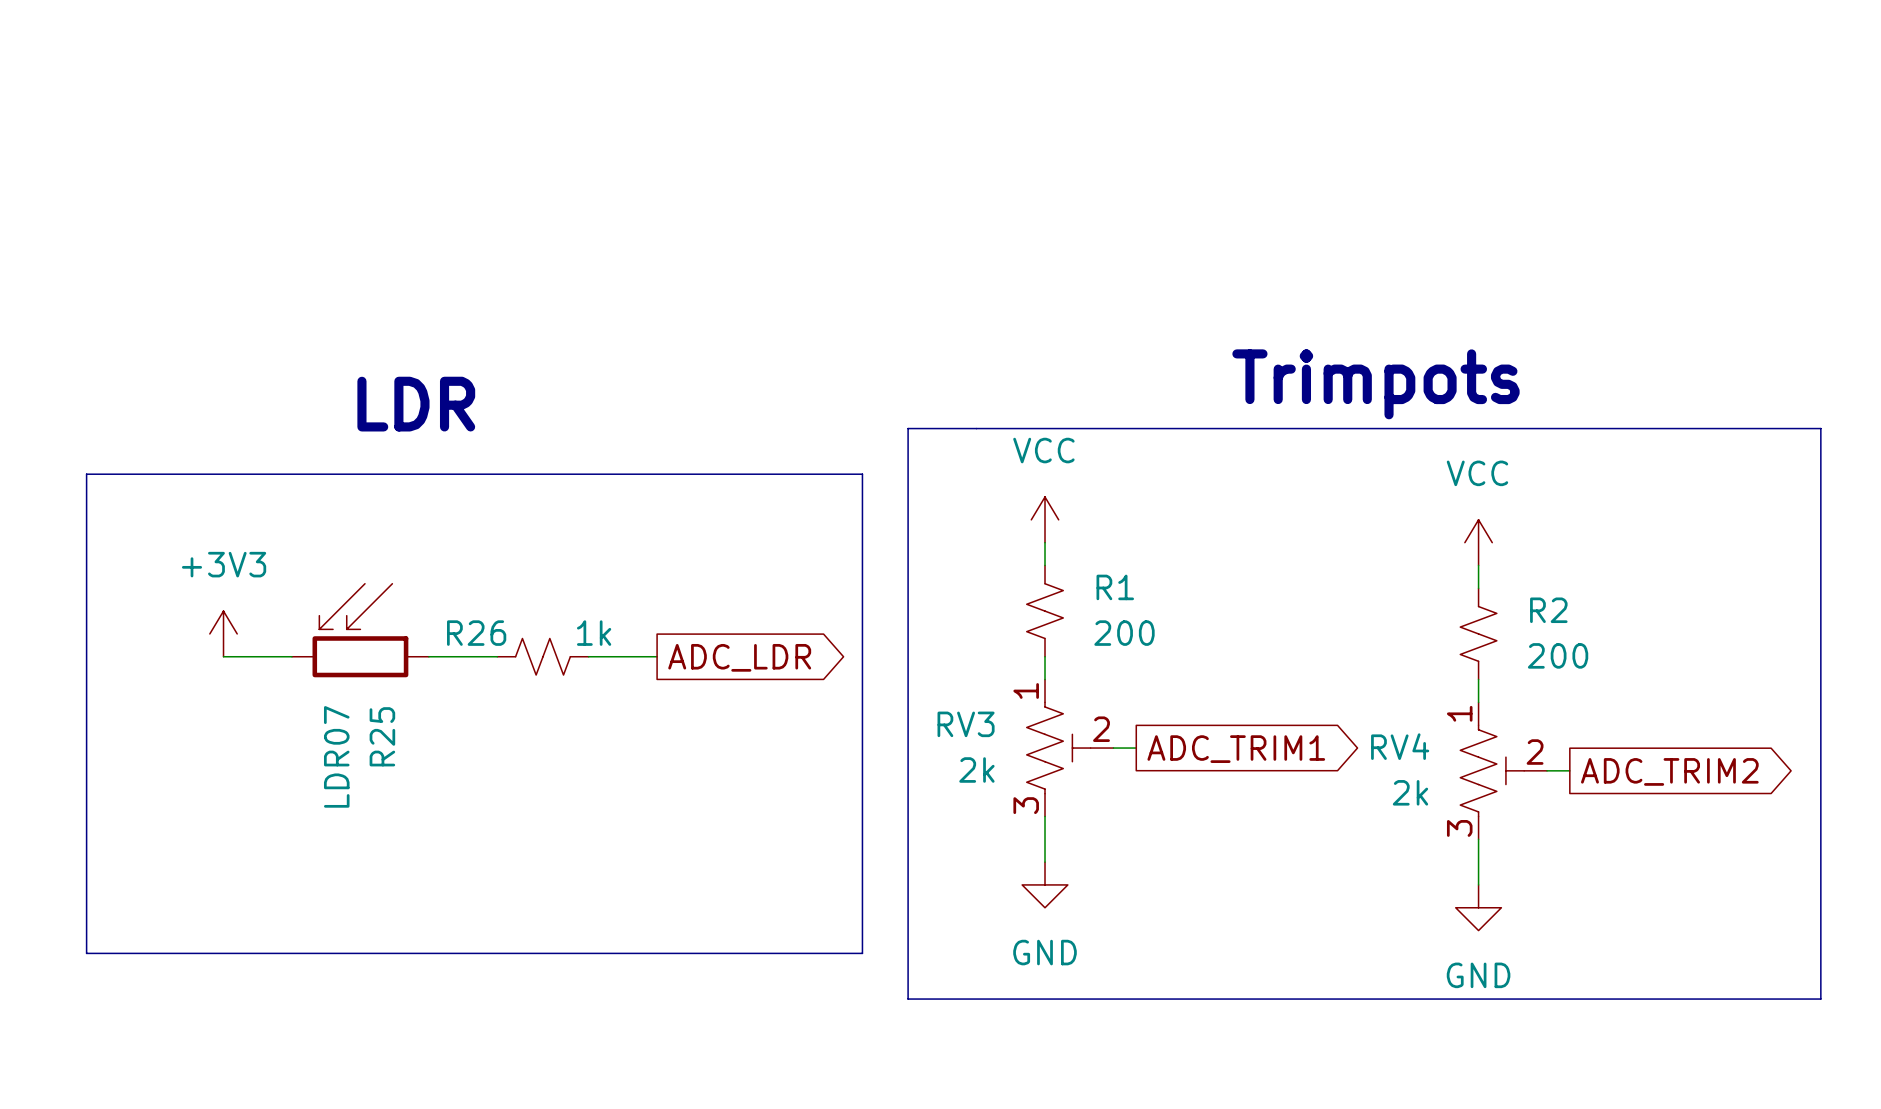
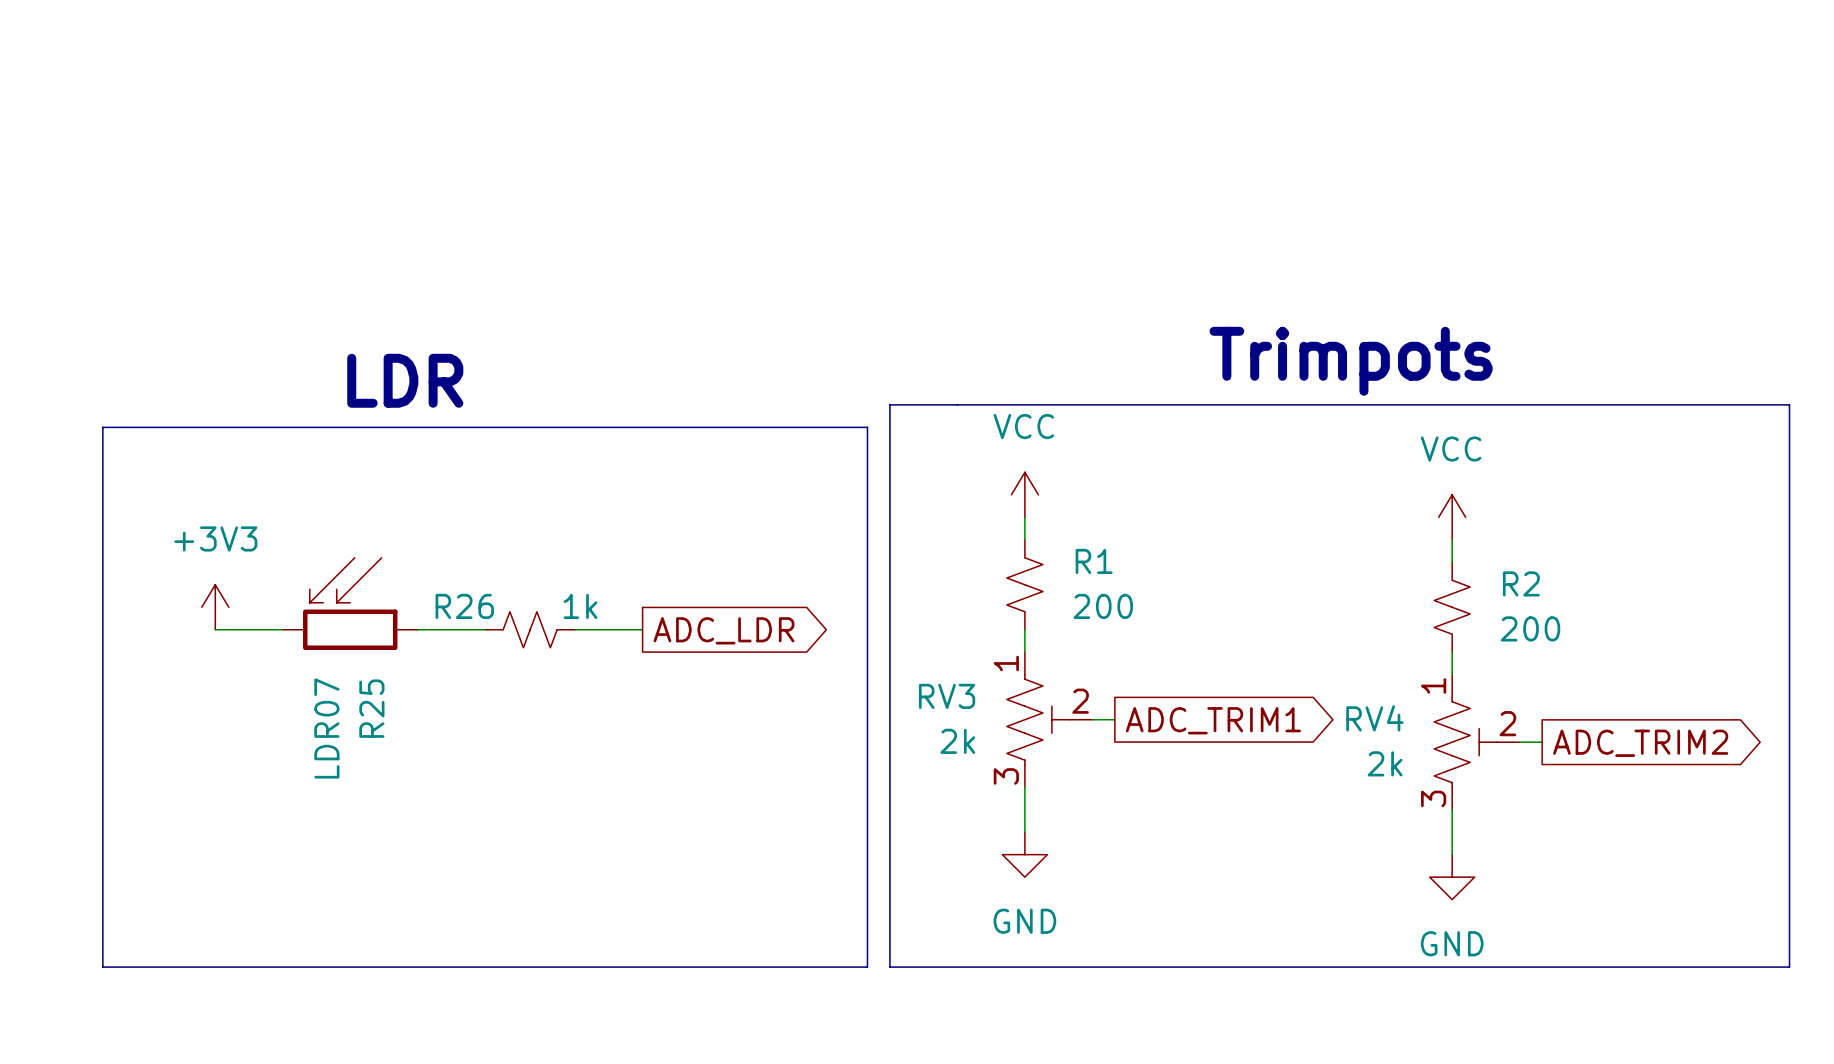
line: (86, 474) (862, 474) (862, 953) (86, 953) (86, 474) -> (102, 427) (102, 967) (867, 967) (867, 427) (102, 427)

